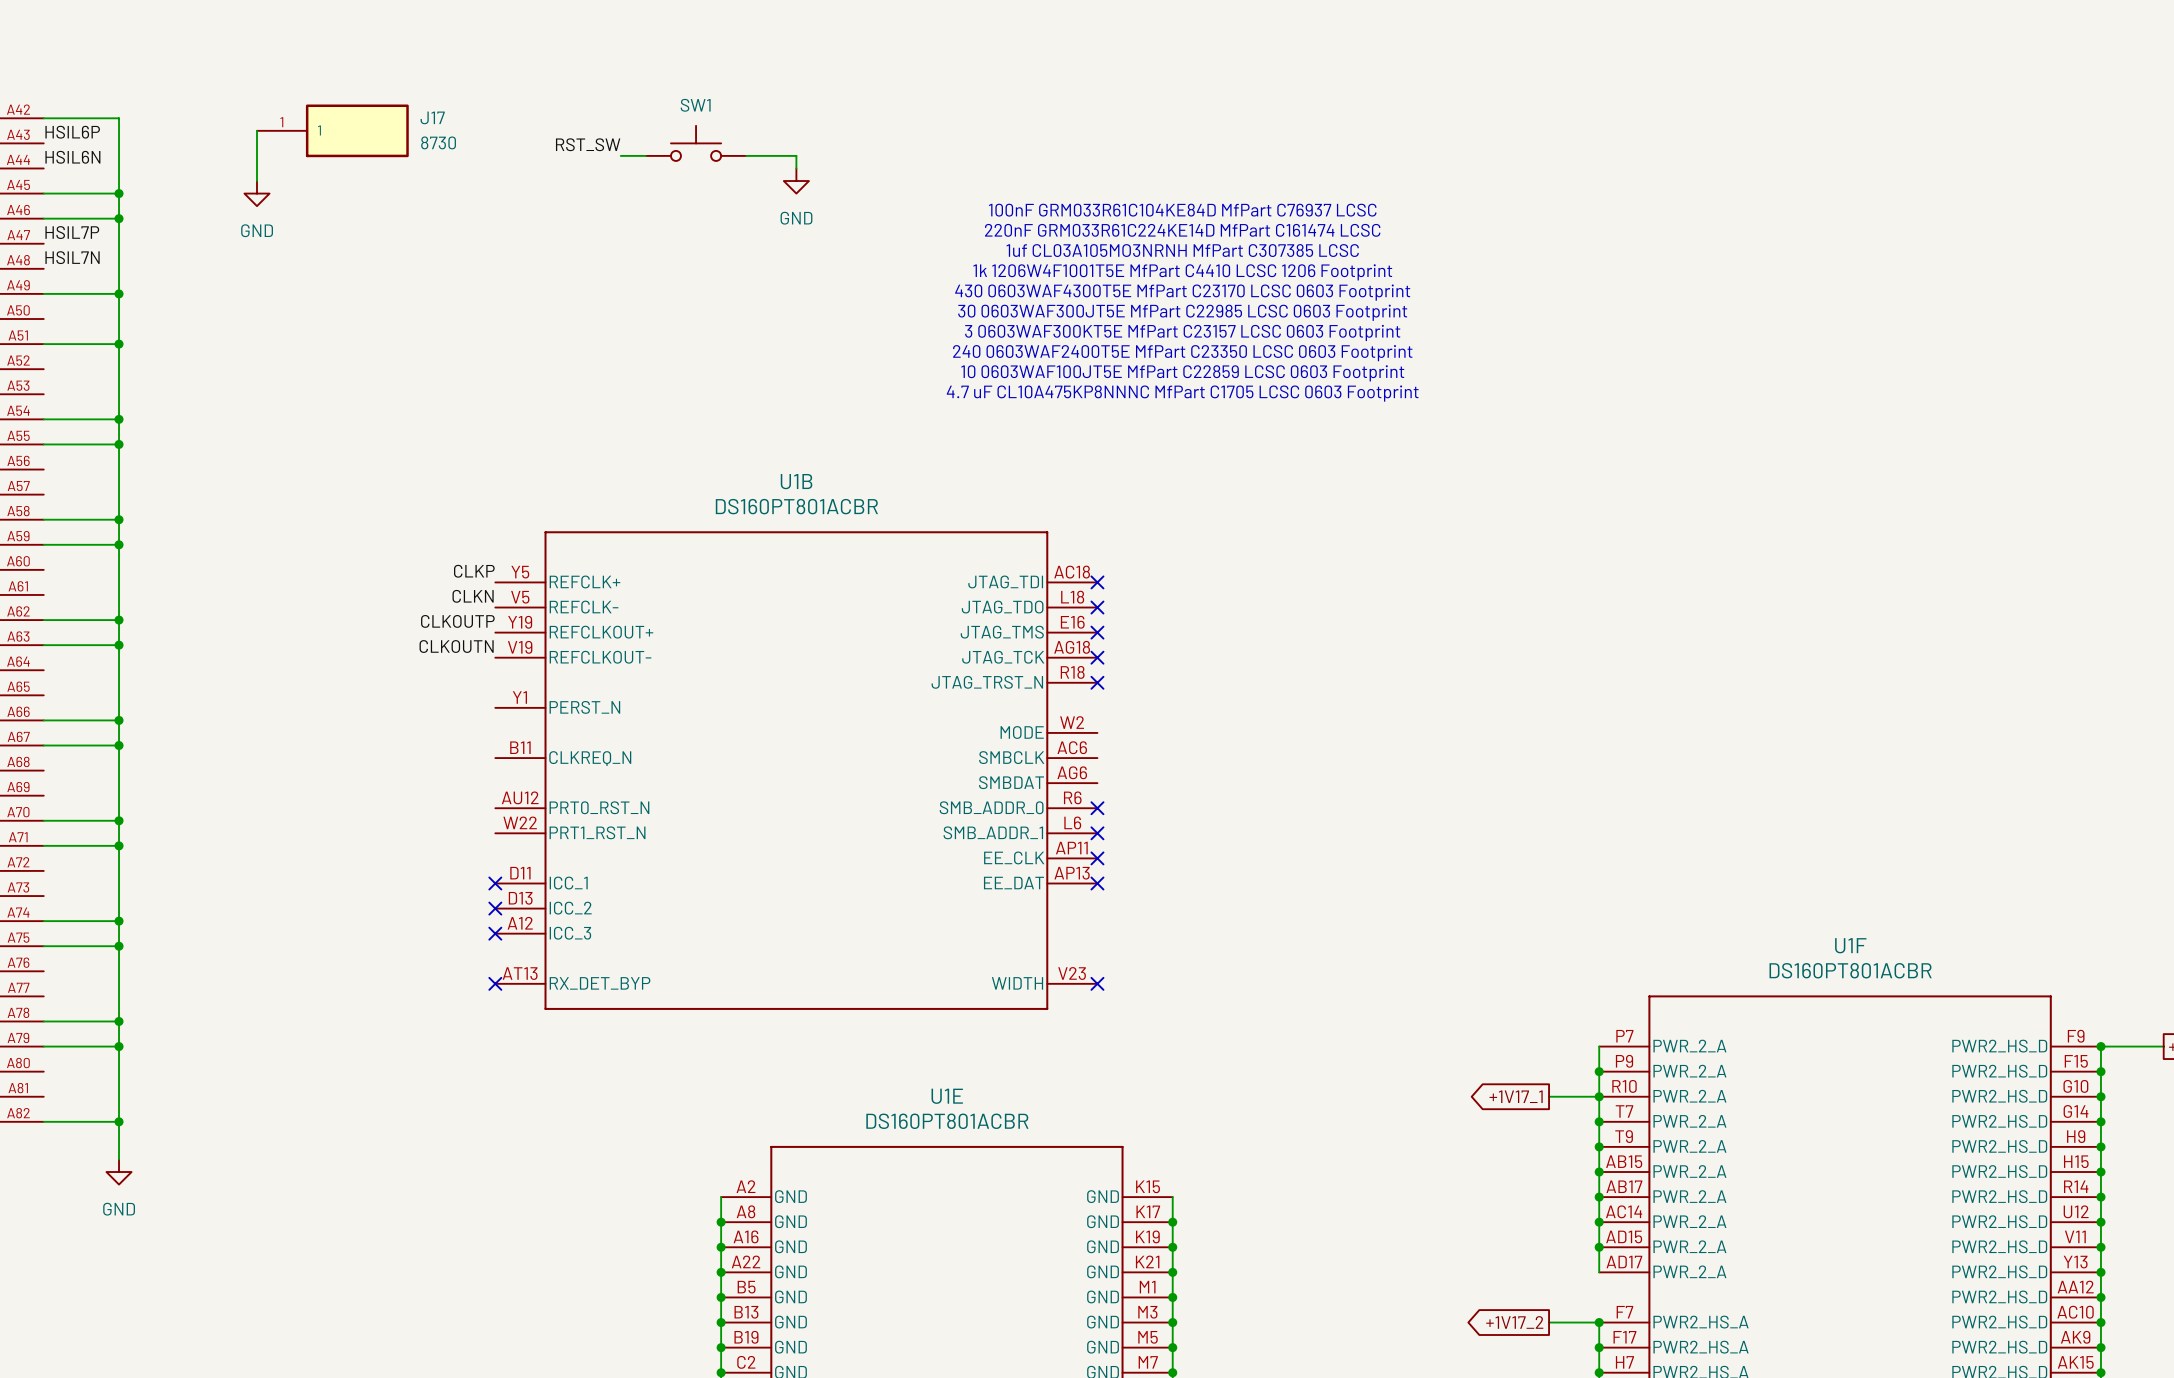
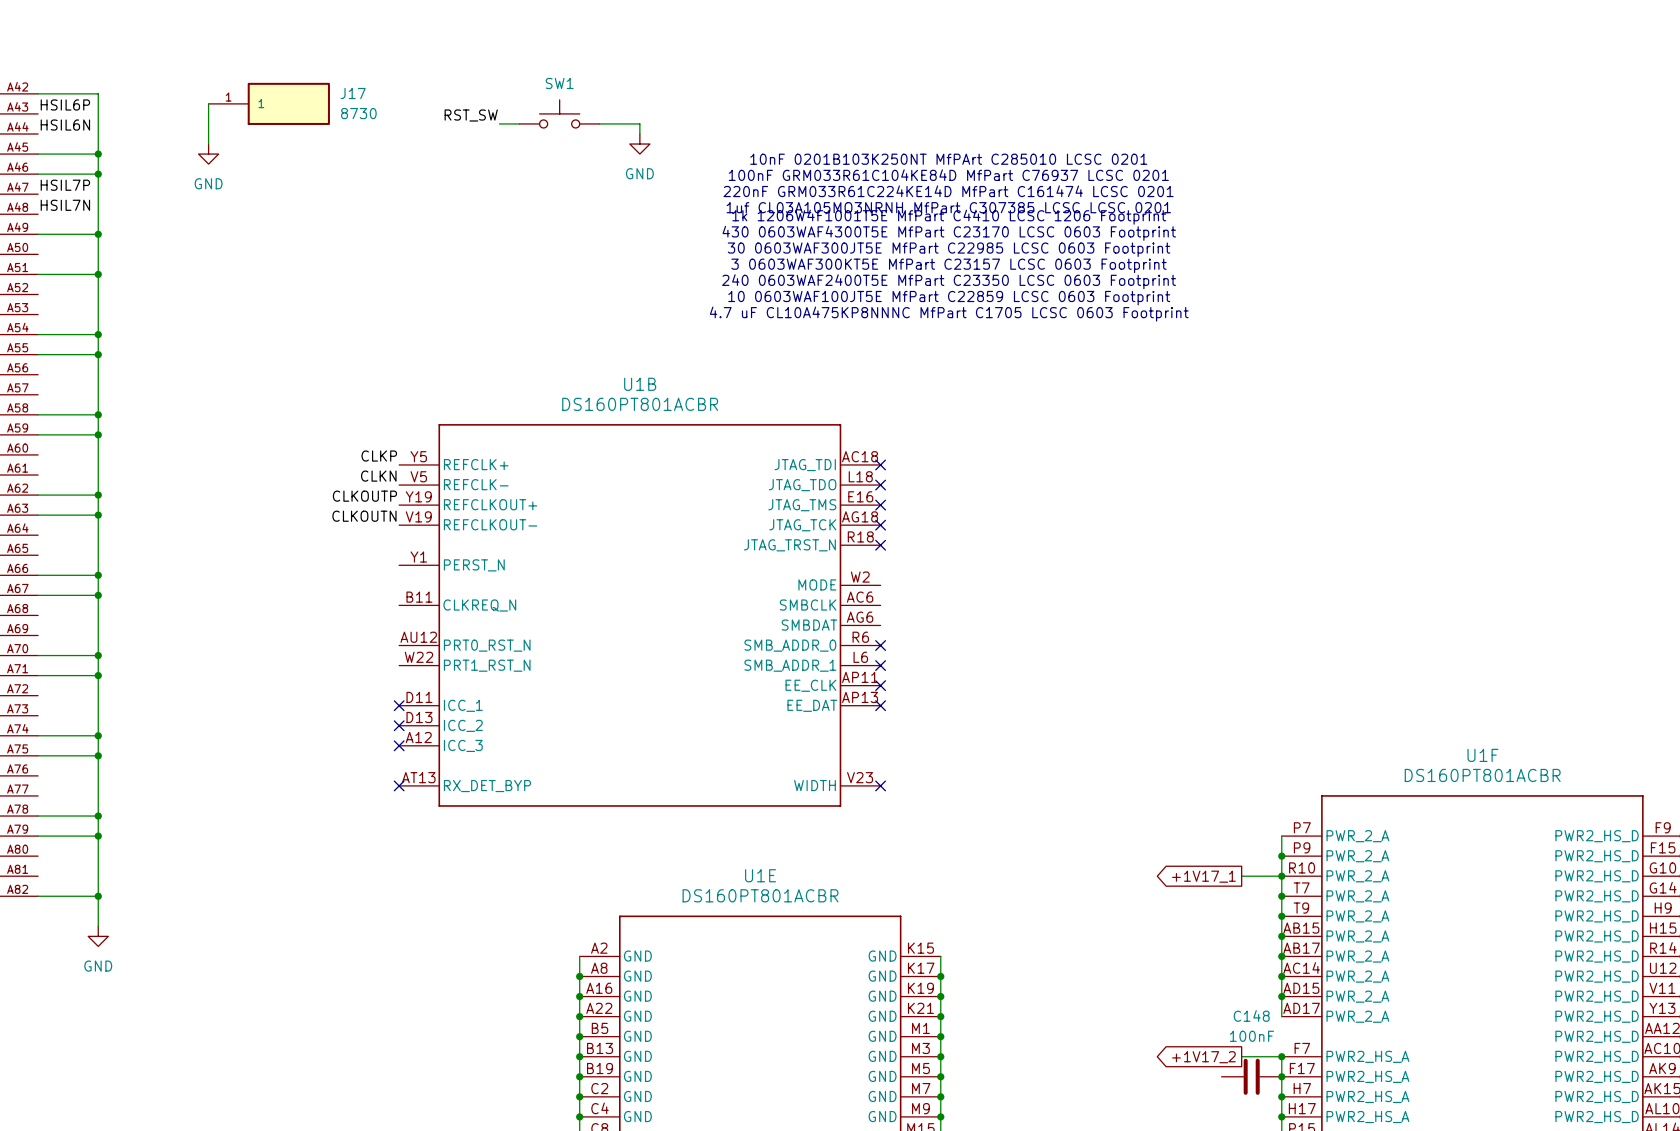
text: none -> 10nF 0201B103K250NT MfPArt C285010 LCSC 0201 (948, 159)
text: 100nF GRM033R61C104KE84D MfPart C76937 LCSC (1182, 210) -> none
text: none -> 100nF GRM033R61C104KE84D MfPart C76937 LCSC 0201 (948, 175)
text: 220nF GRM033R61C224KE14D MfPart C161474 LCSC (1182, 230) -> none
text: none -> 220nF GRM033R61C224KE14D MfPart C161474 LCSC 0201 (948, 191)
text: 1uf CL03A105MO3NRNH MfPart C307385 LCSC (1182, 250) -> 1uf CL03A105MO3NRNH MfPart C307385 LCSC LCSC 0201 (948, 207)
C148: none -> 100nF (1251, 1076)

